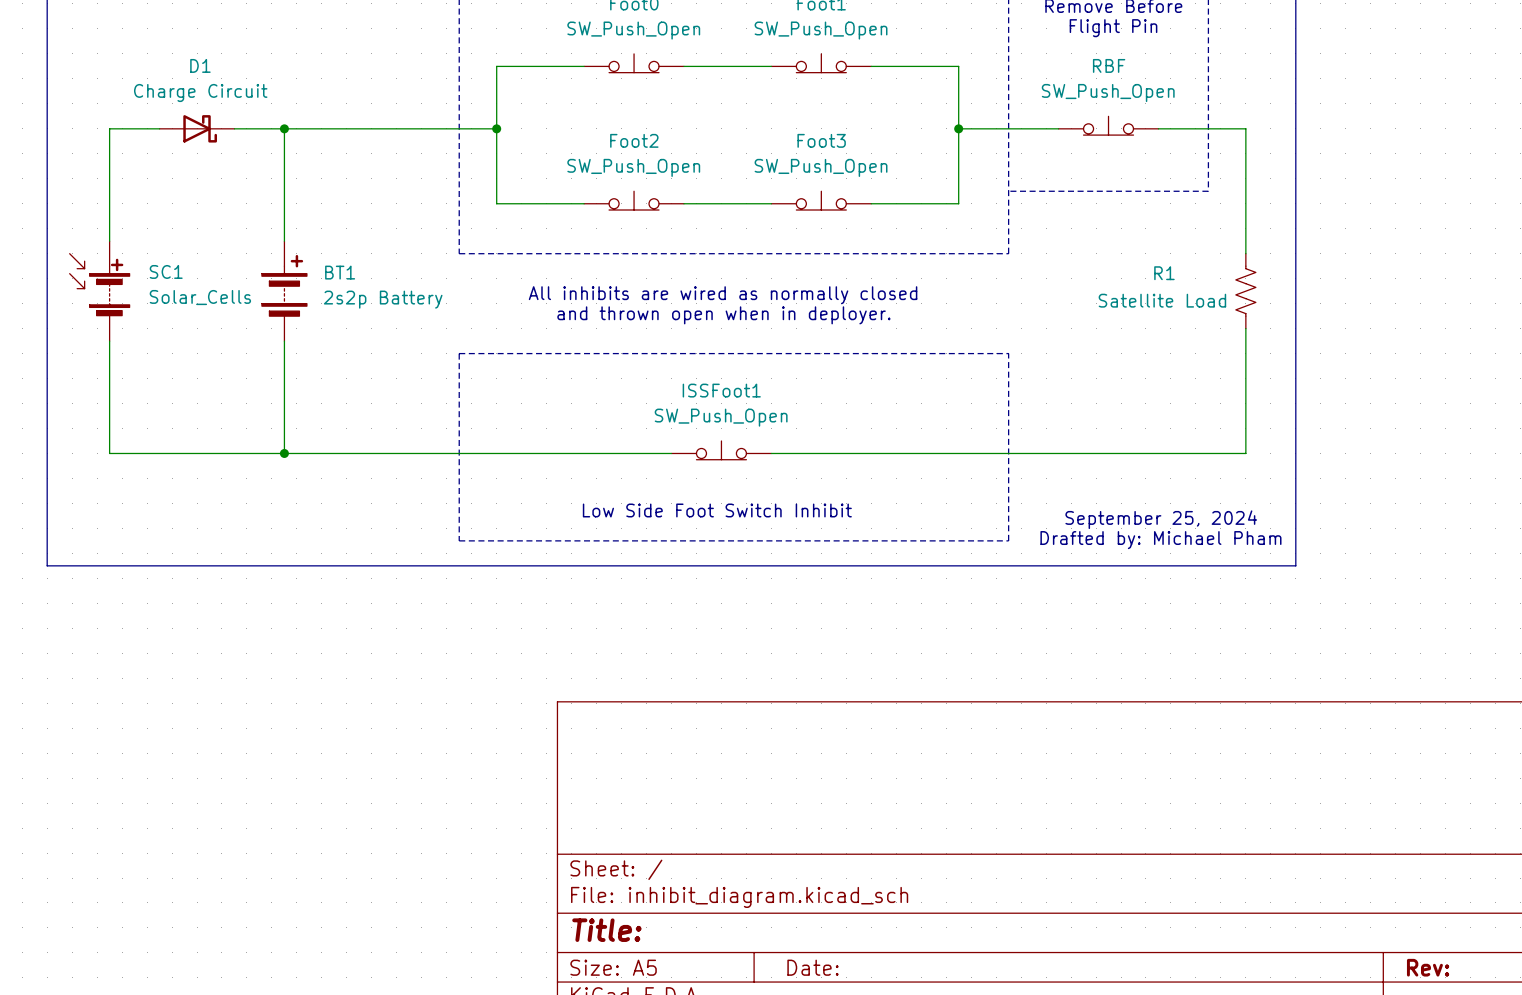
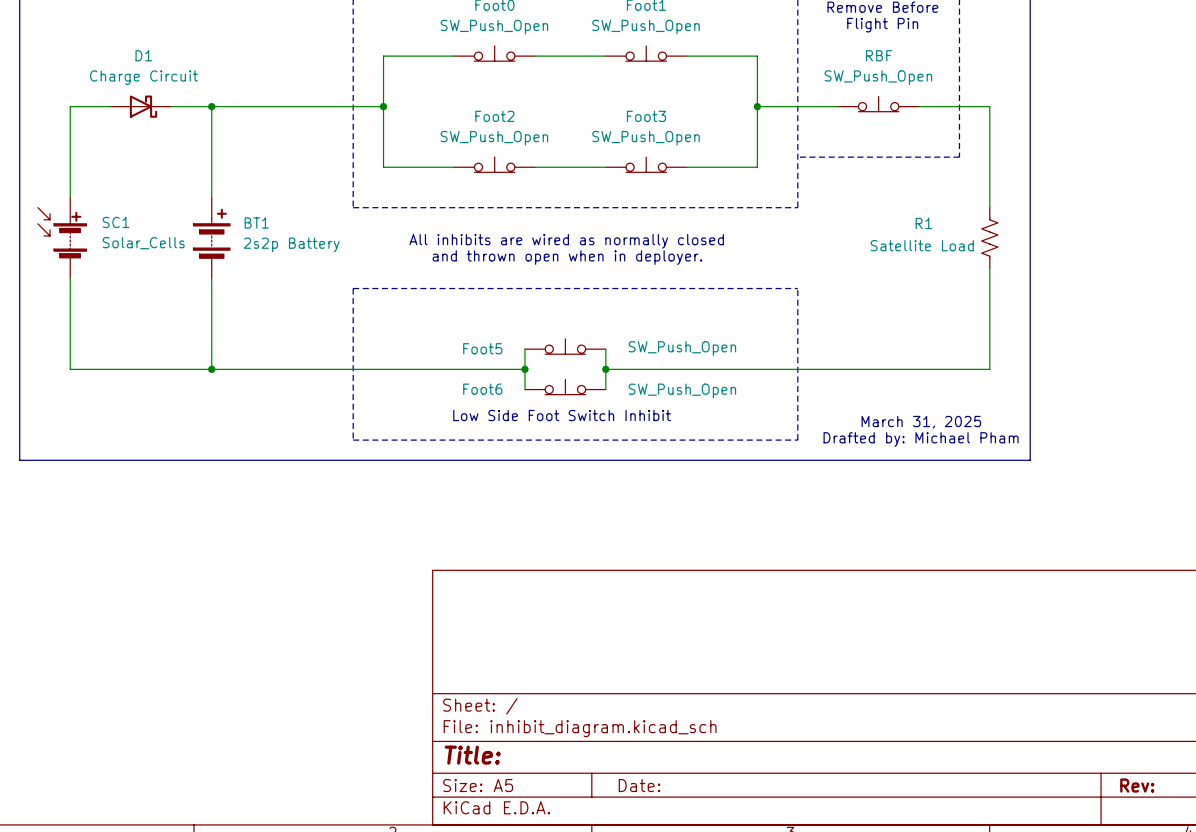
Foot5: none -> SW_Push_Open (565, 346)
wire: none -> (524, 349) (524, 389)
wire: none -> (605, 349) (605, 389)
ISSFoot1: SW_Push_Open (721, 450) -> none
junction: none -> (524, 369)
junction: none -> (605, 369)
Foot6: none -> SW_Push_Open (565, 387)
text: September 25, 2024 (1161, 519) -> March 31, 2025 (921, 422)

